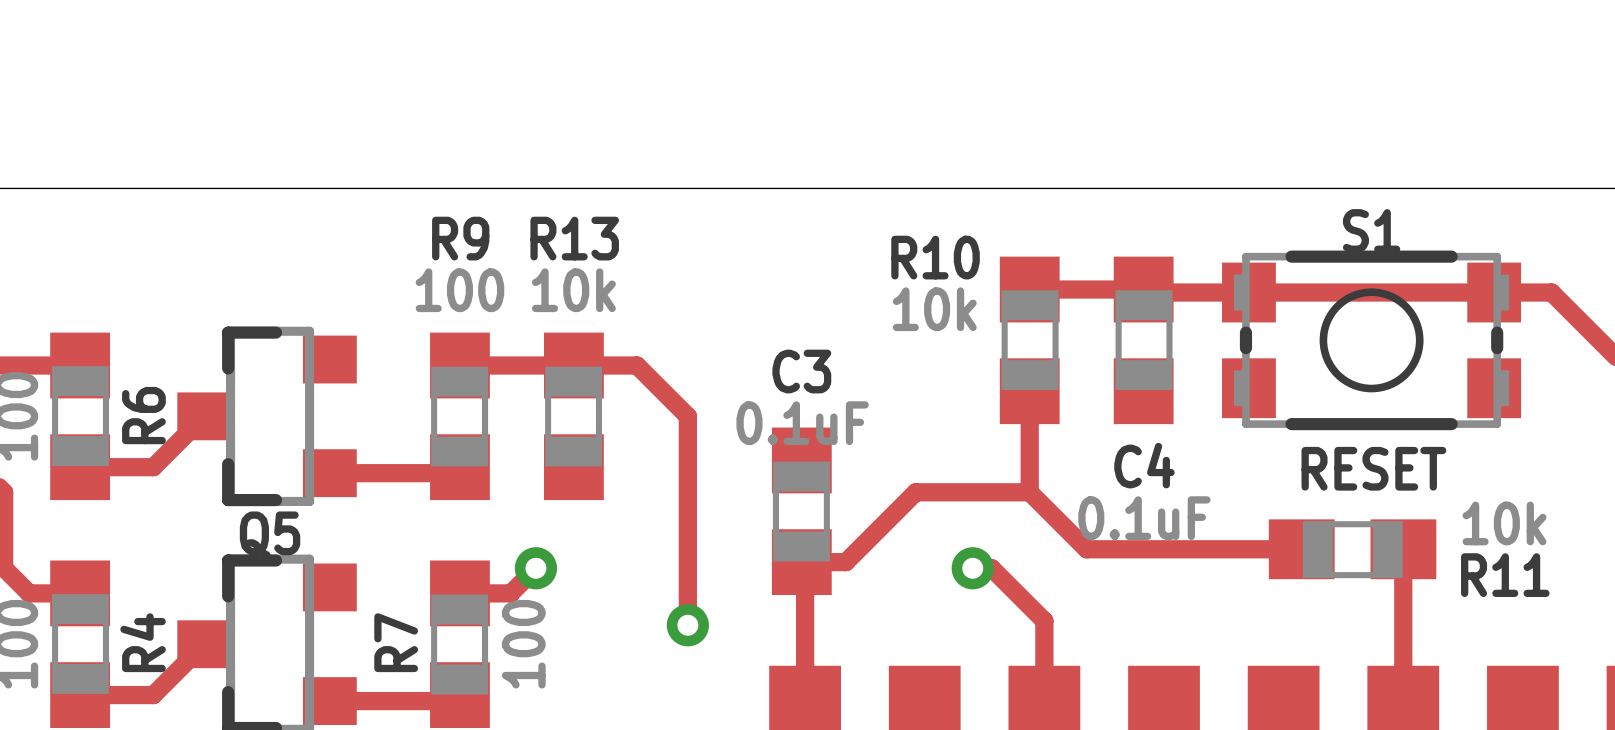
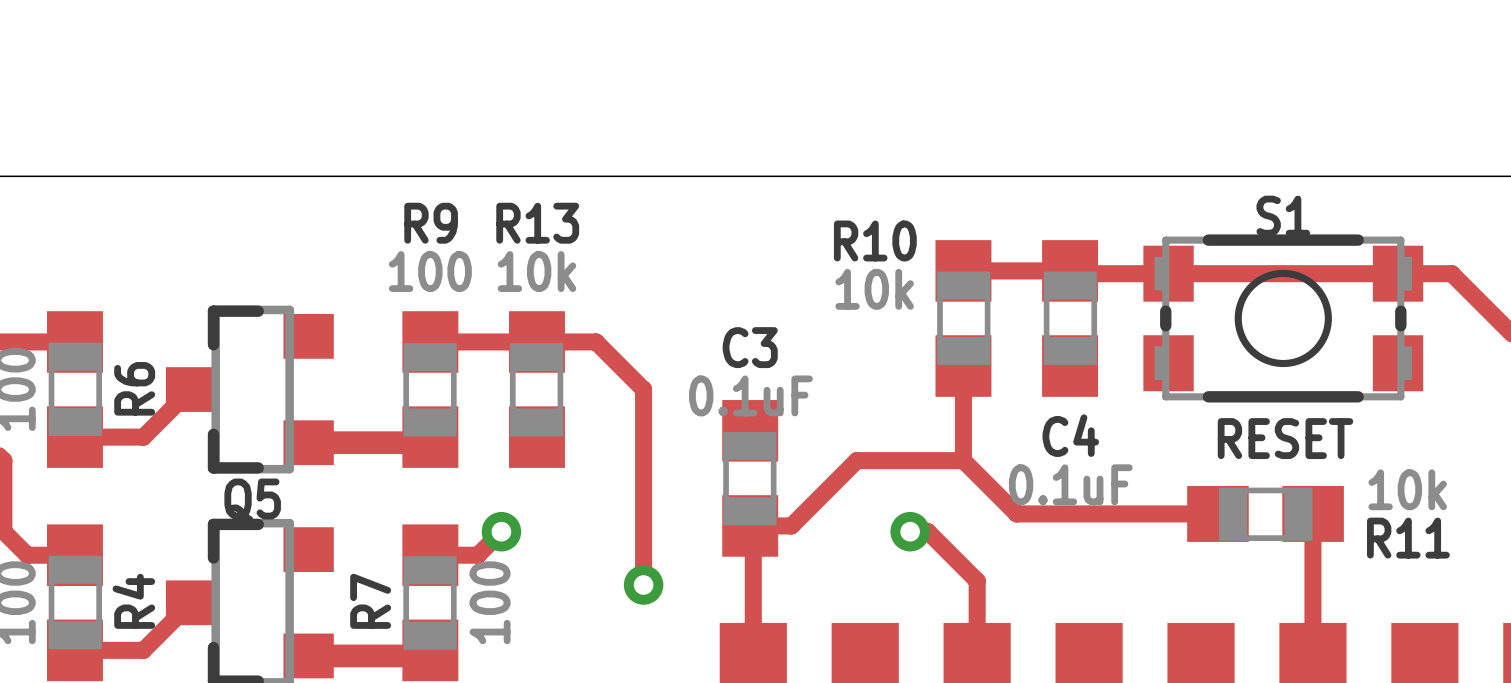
track width: thin (329, 473) (453, 473) -> thick (308, 442) (424, 442)
track width: thin (329, 701) (453, 701) -> thick (308, 655) (424, 655)

